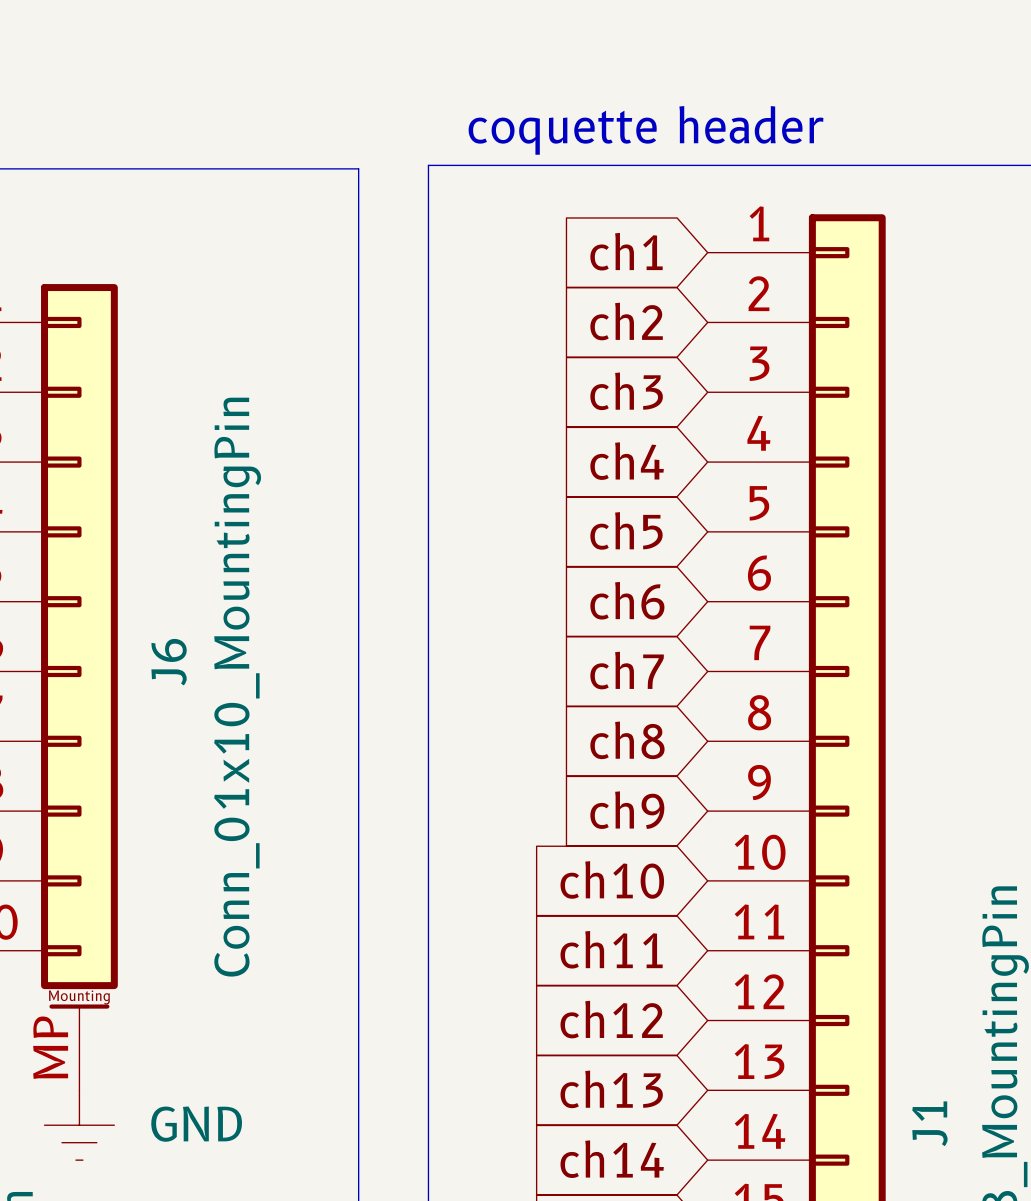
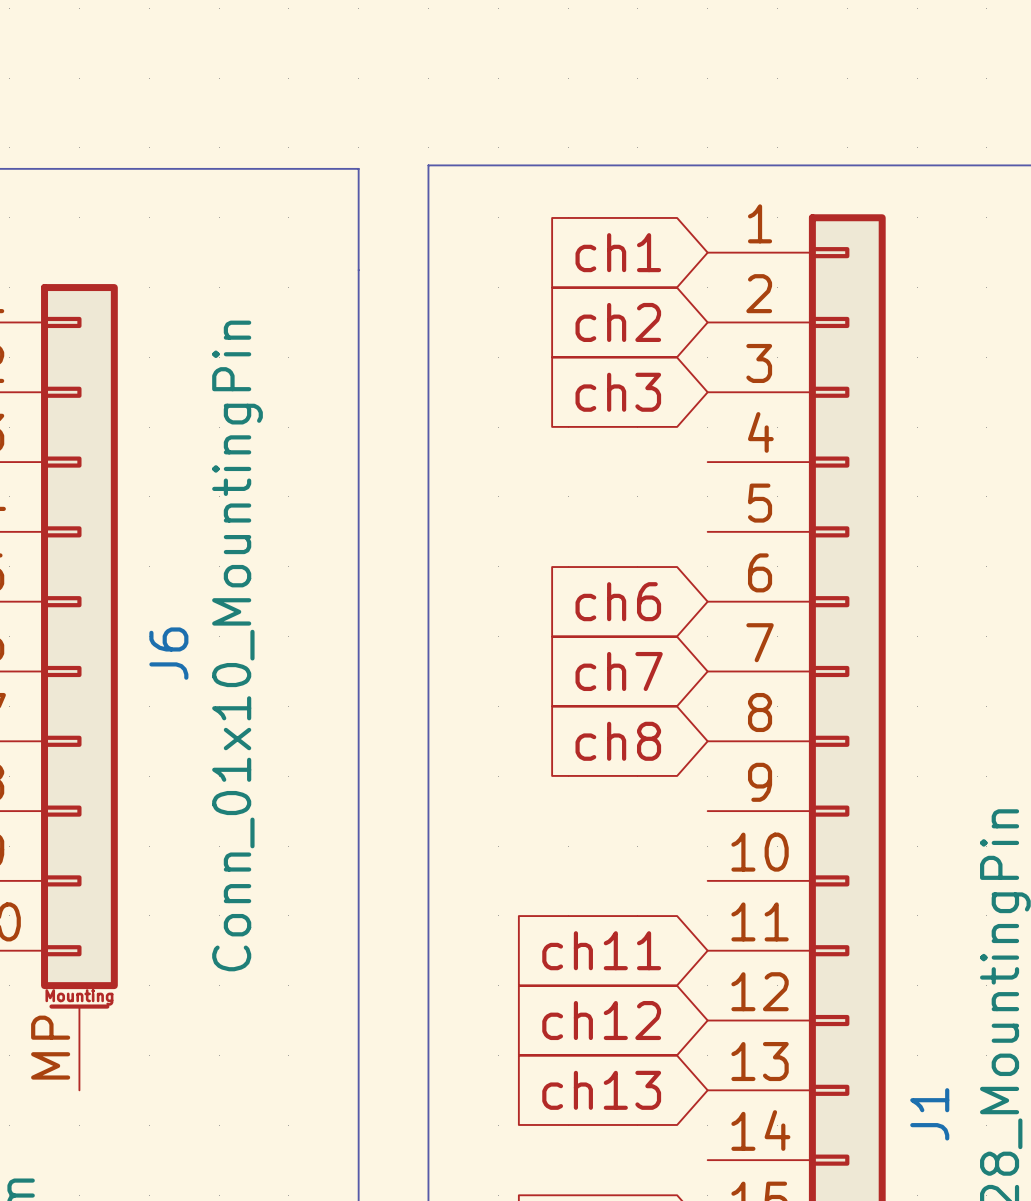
text: coquette header (646, 130) -> none
global label: ch4 (627, 461) -> none
global label: ch5 (626, 530) -> none
global label: ch9 (627, 810) -> none
global label: ch10 (612, 879) -> none
power symbol: GND (79, 1125) -> none
global label: ch14 (612, 1159) -> none

